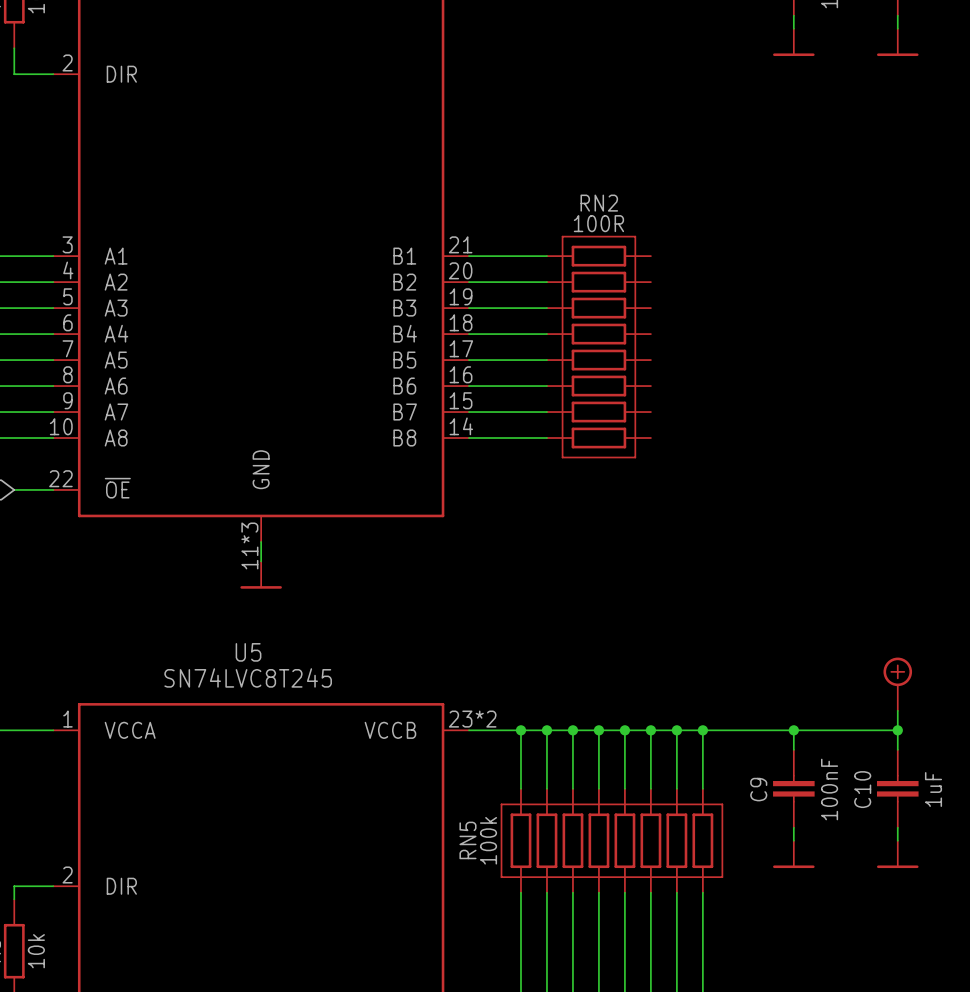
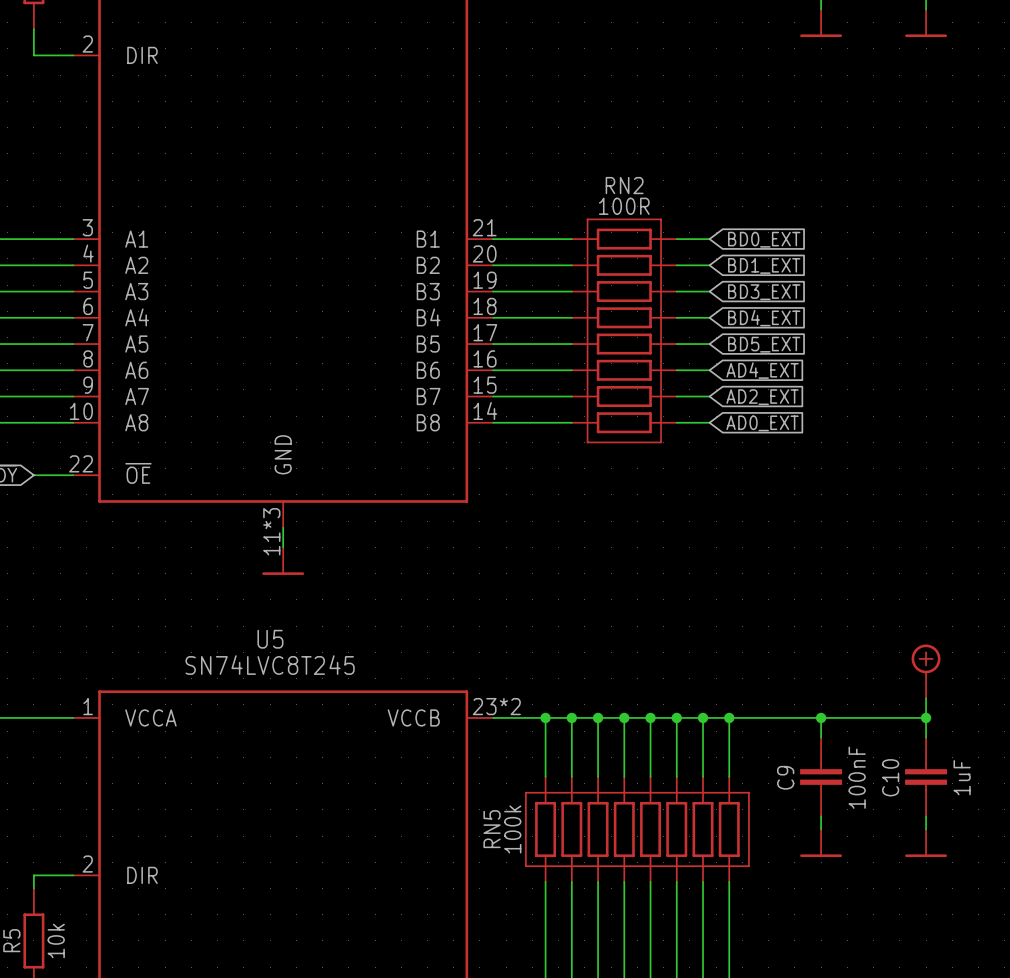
wire: none -> (676, 239) (709, 239)
global label: none -> BD0_EXT (764, 239)
wire: none -> (676, 265) (709, 265)
global label: none -> BD1_EXT (764, 265)
wire: none -> (676, 291) (709, 291)
global label: none -> BD3_EXT (764, 292)
wire: none -> (676, 317) (709, 317)
global label: none -> BD4_EXT (764, 318)
wire: none -> (676, 344) (709, 344)
global label: none -> BD5_EXT (764, 344)
wire: none -> (676, 370) (709, 370)
global label: none -> AD4_EXT (762, 370)
wire: none -> (676, 396) (709, 396)
global label: none -> AD2_EXT (762, 397)
wire: none -> (676, 422) (709, 422)
global label: none -> AD0_EXT (762, 423)

